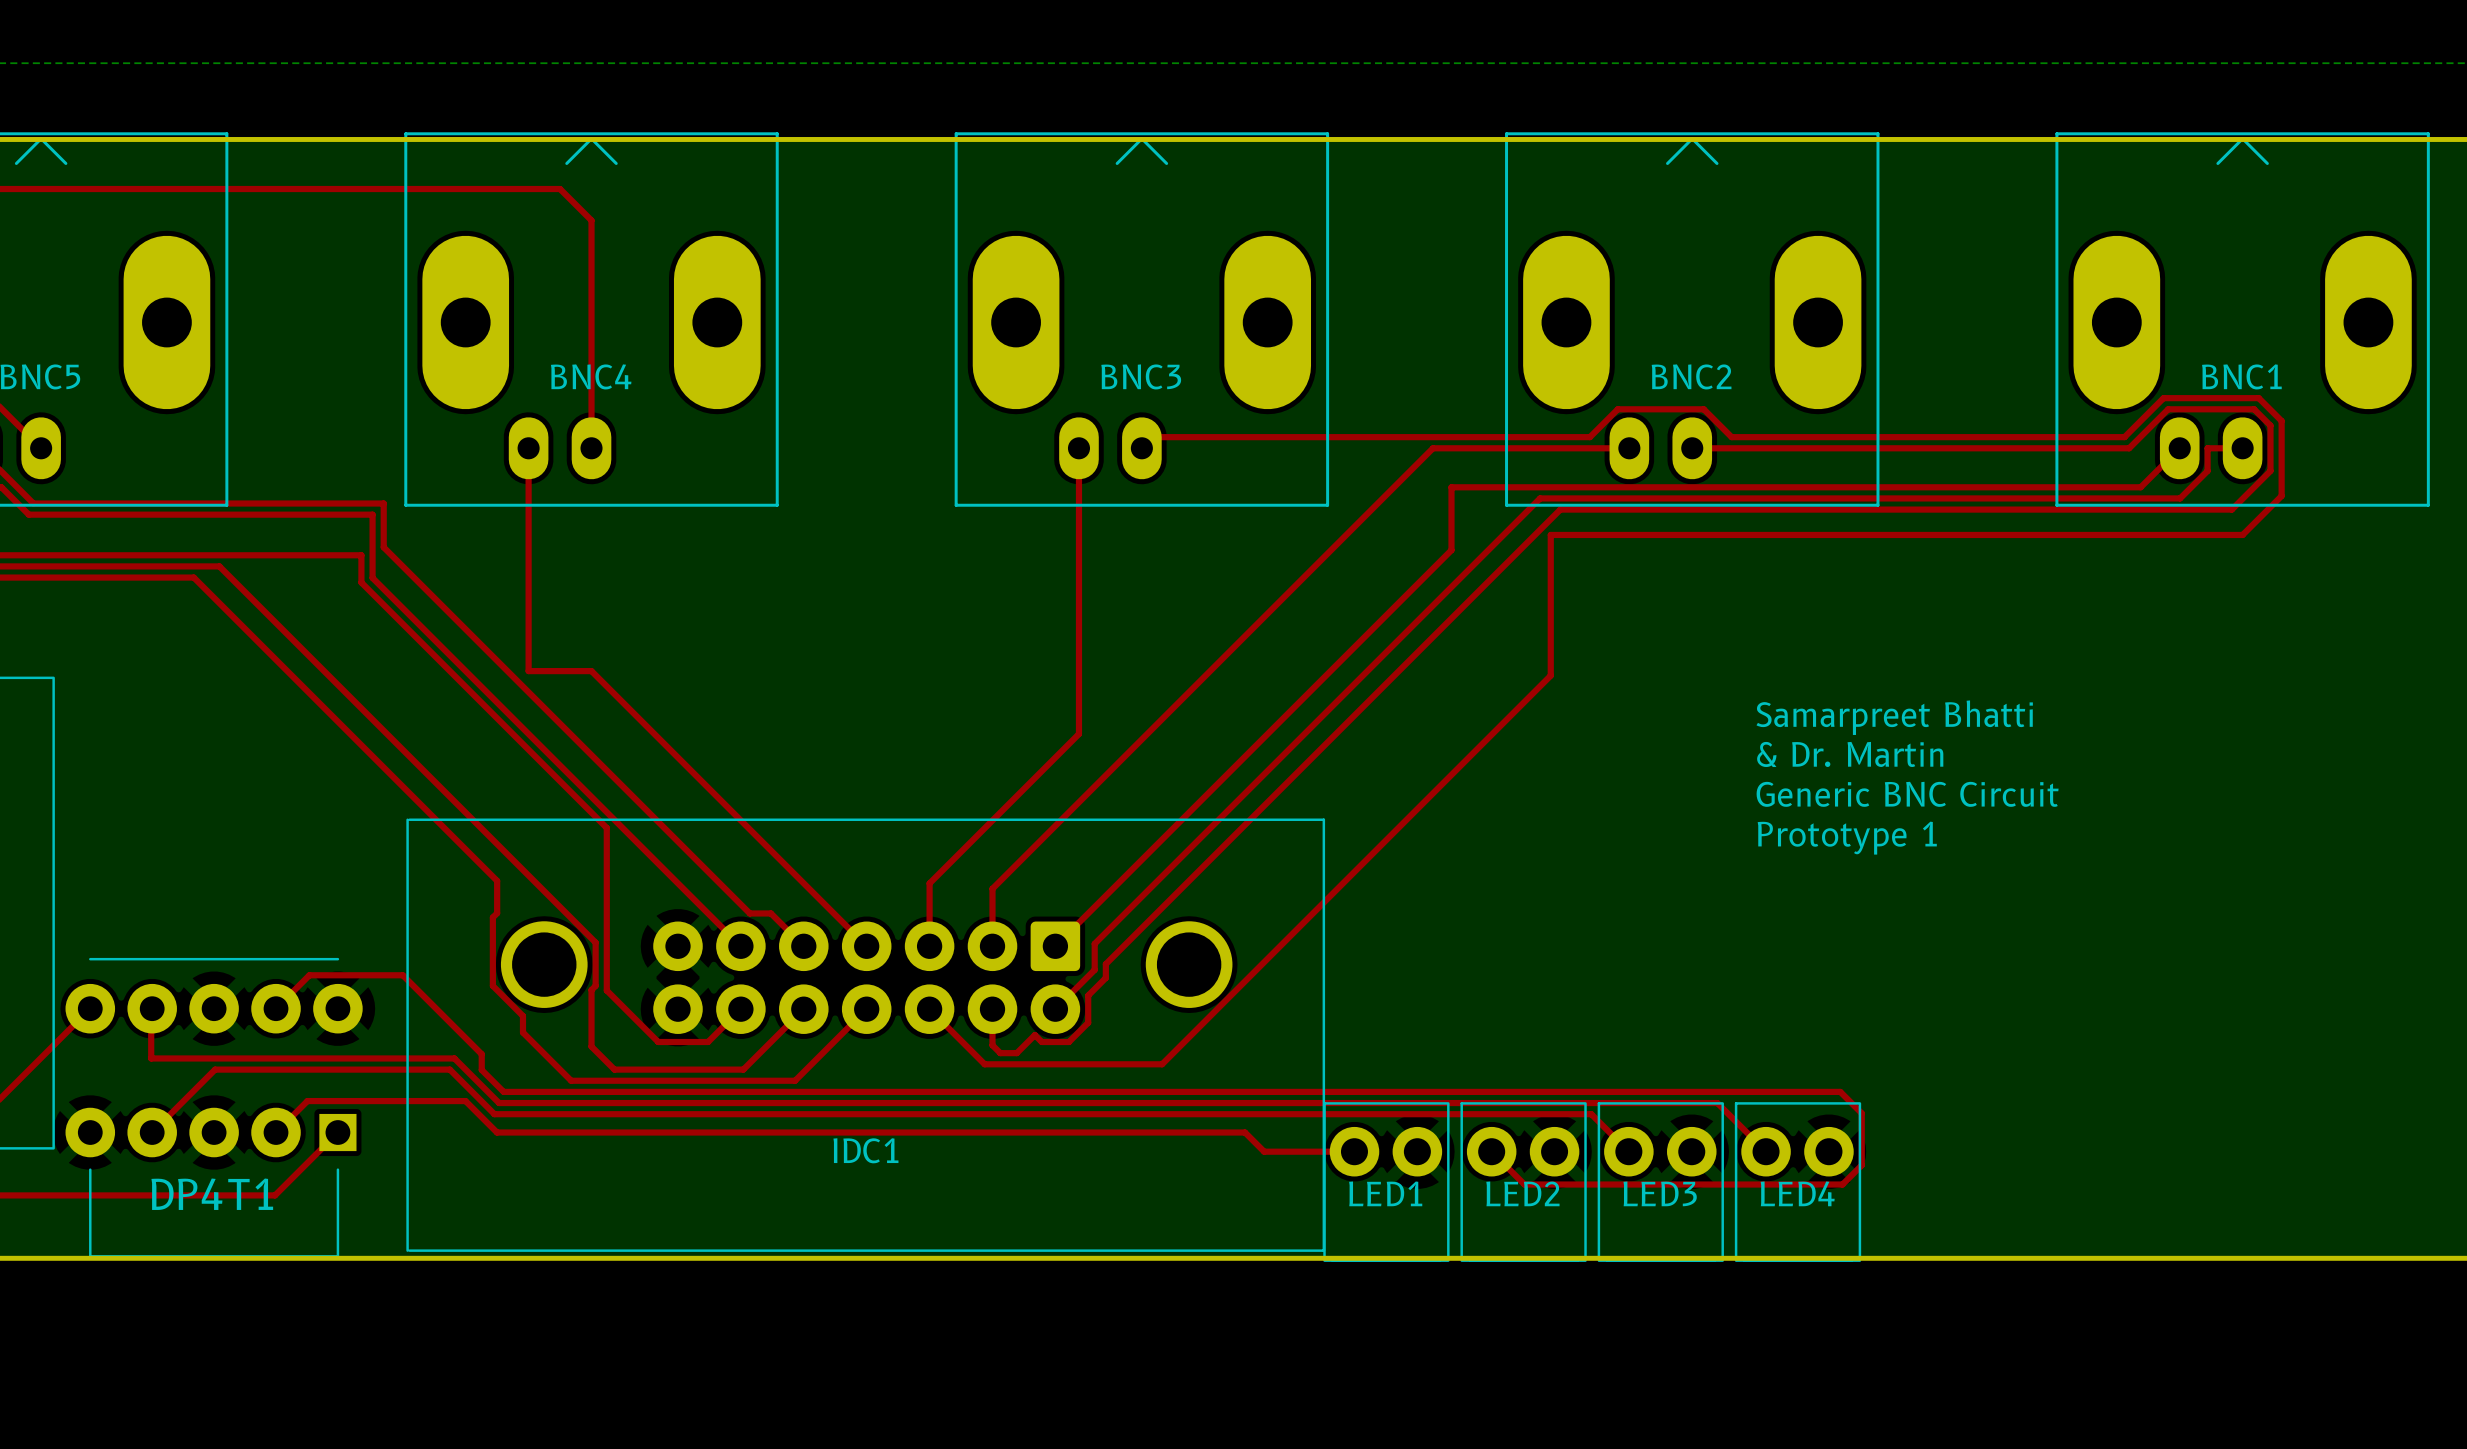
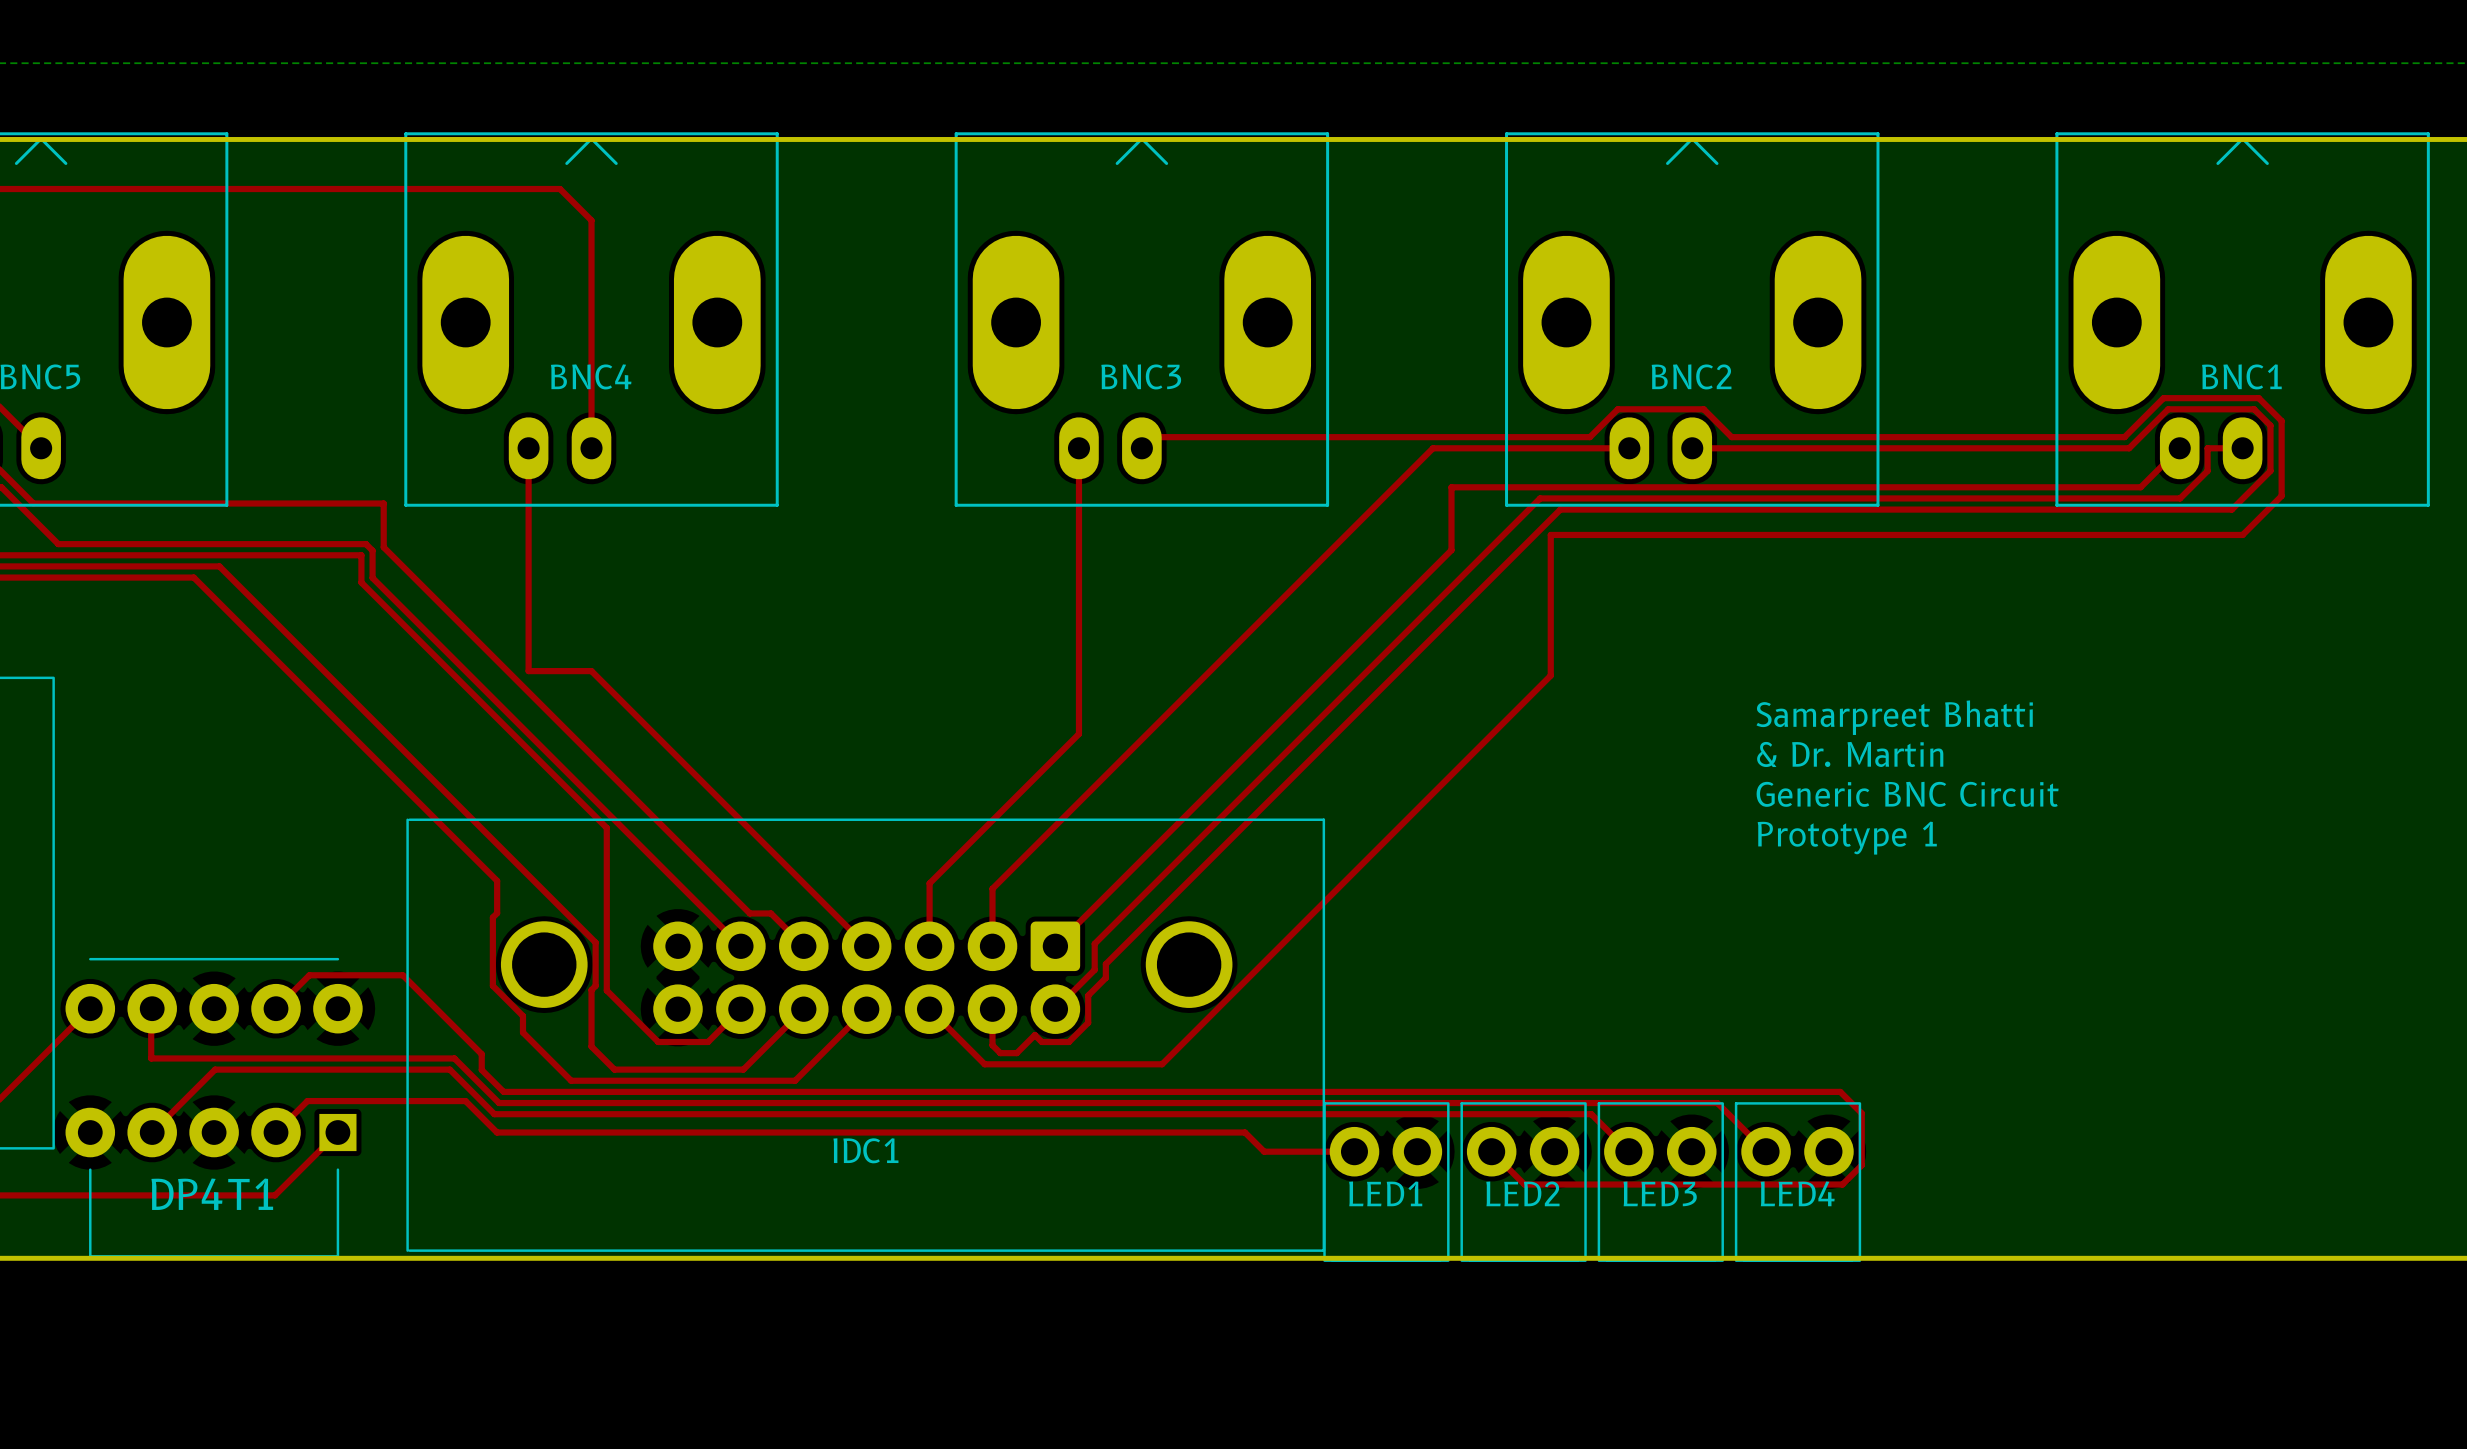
top track: (28, 514) (372, 514) (372, 550) -> (28, 514) (58, 544) (366, 544) (372, 550)

